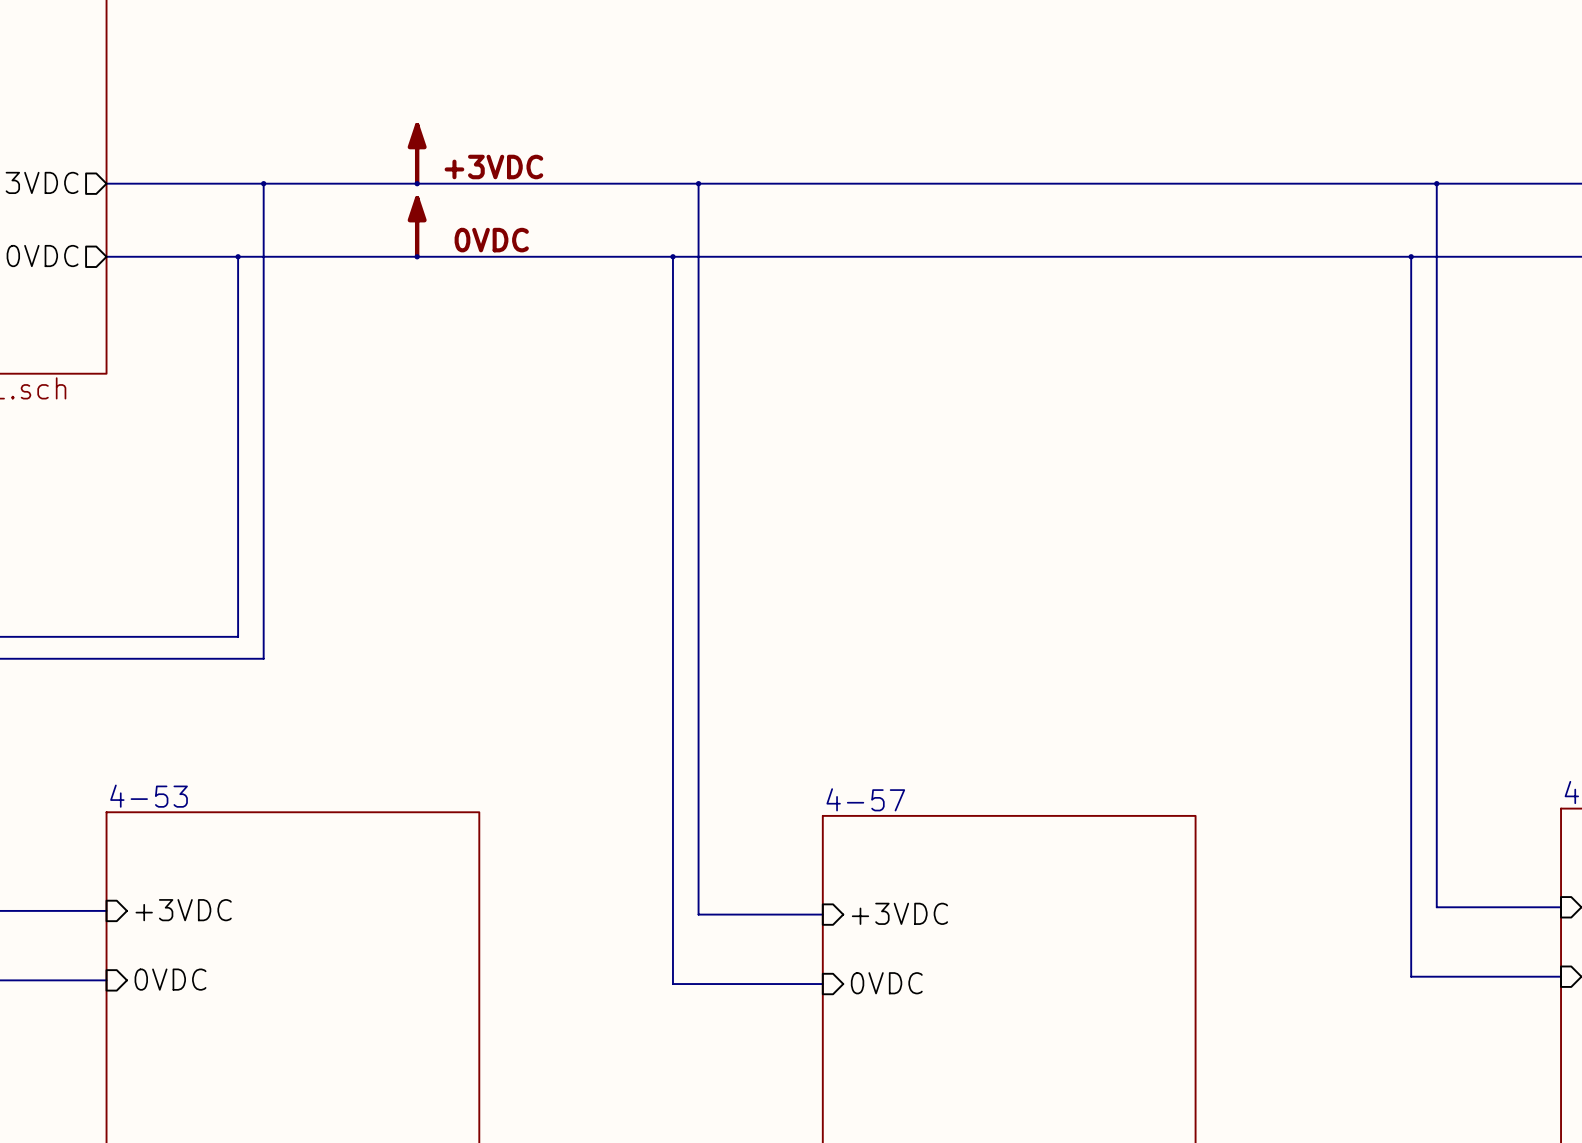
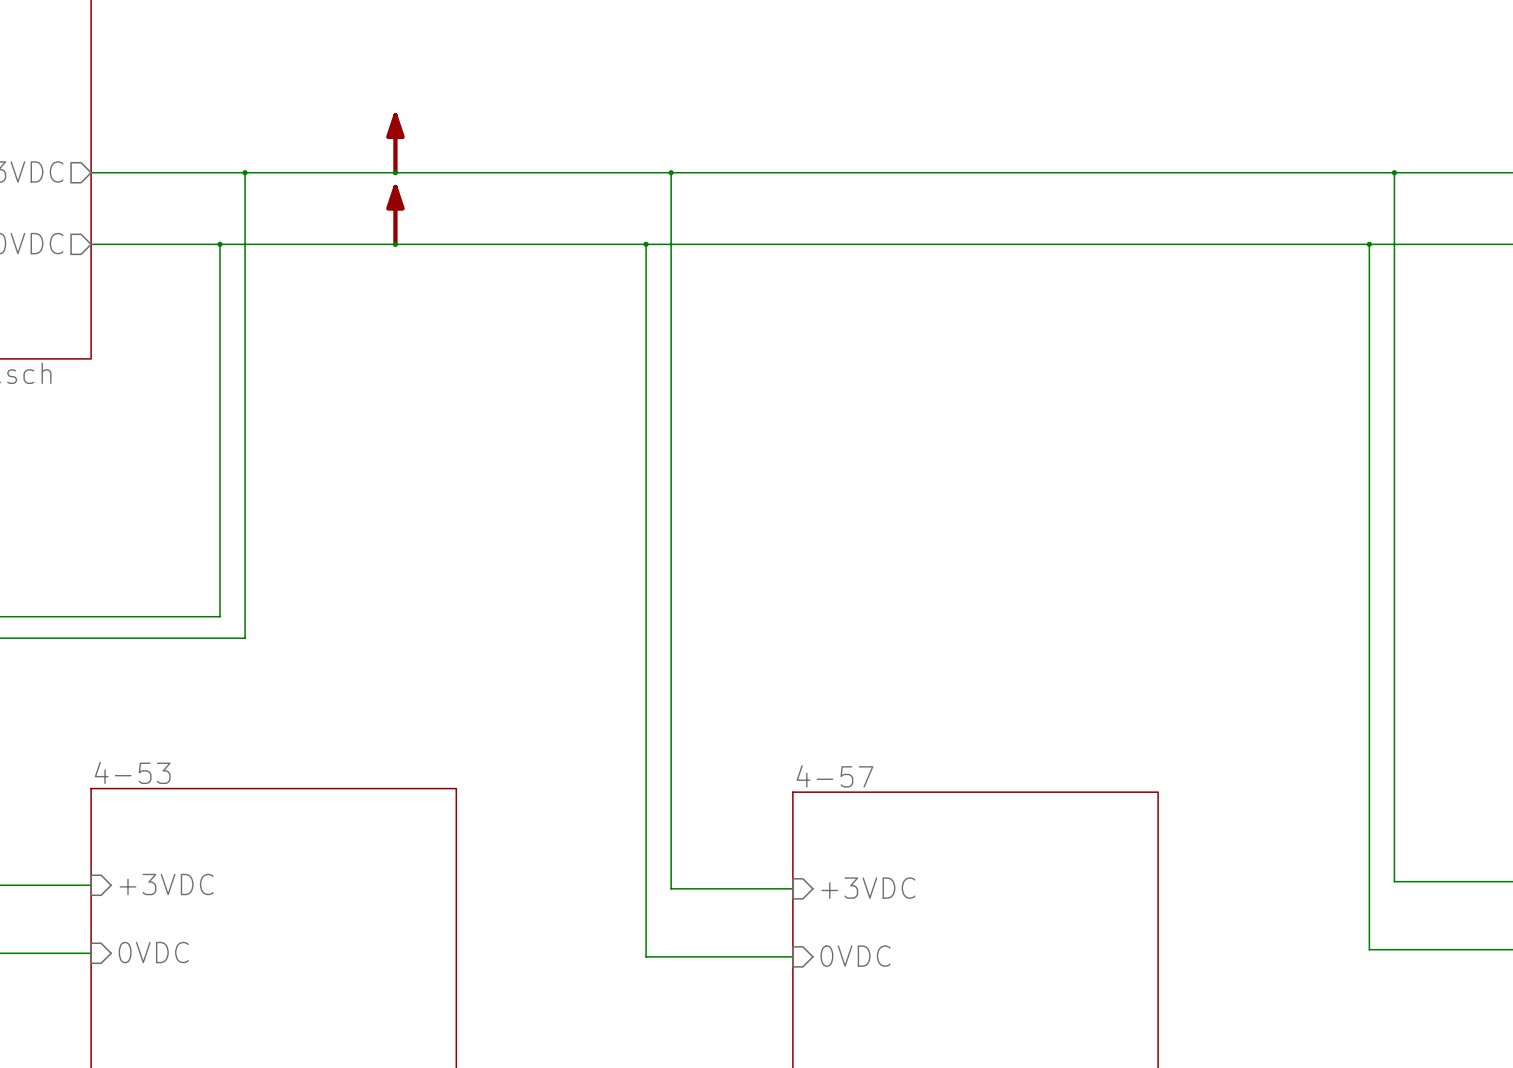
label: +3VDC (493, 167) -> none
label: 0VDC (491, 240) -> none

